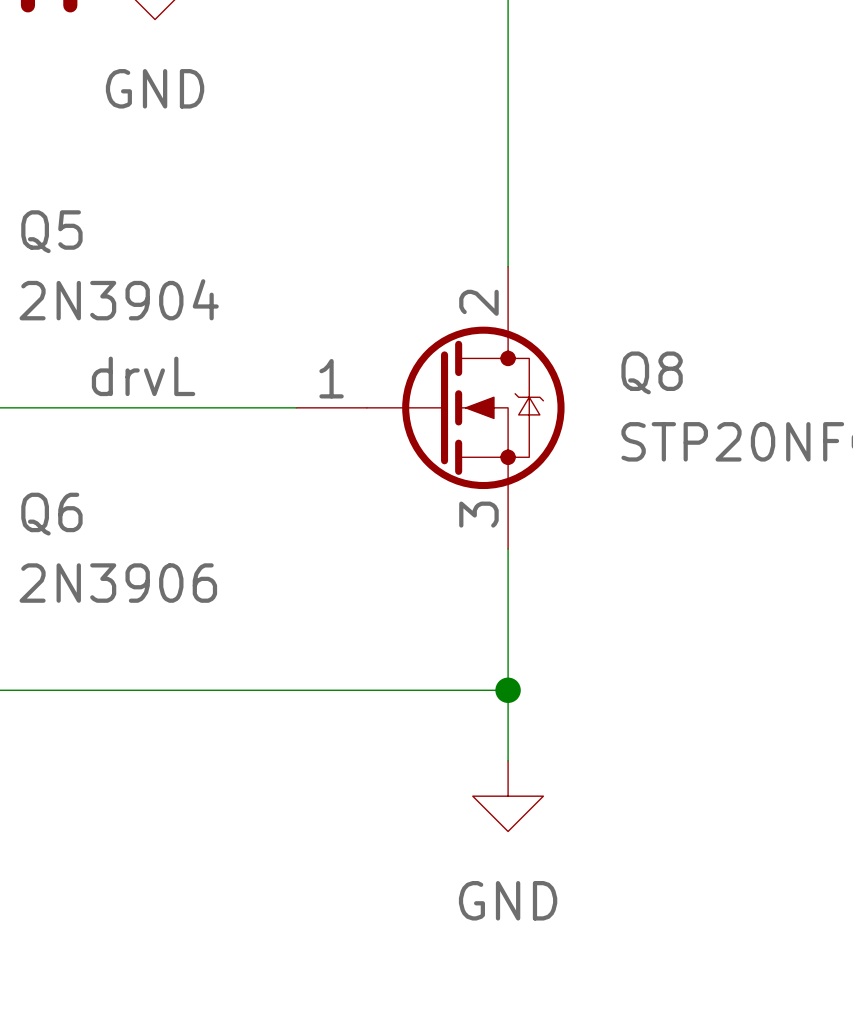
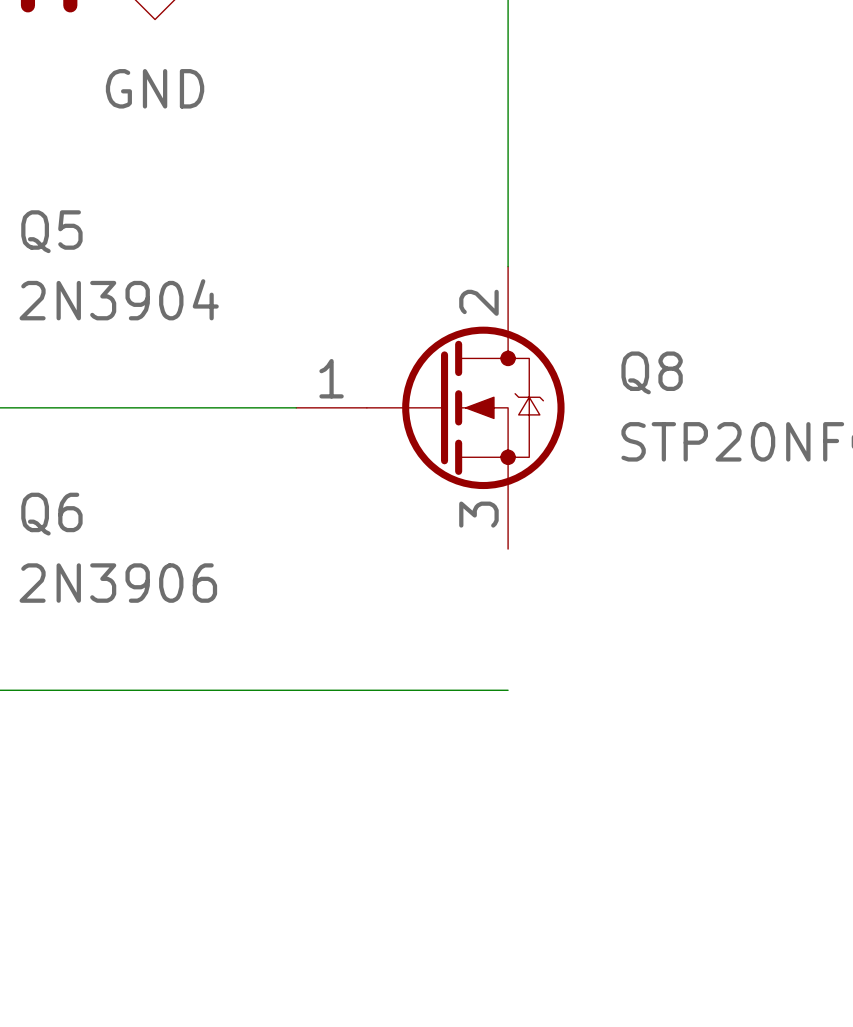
label: drvL (143, 376) -> none
wire: (508, 549) (508, 760) -> none
junction: (508, 690) -> none
power symbol: GND (508, 796) -> none

